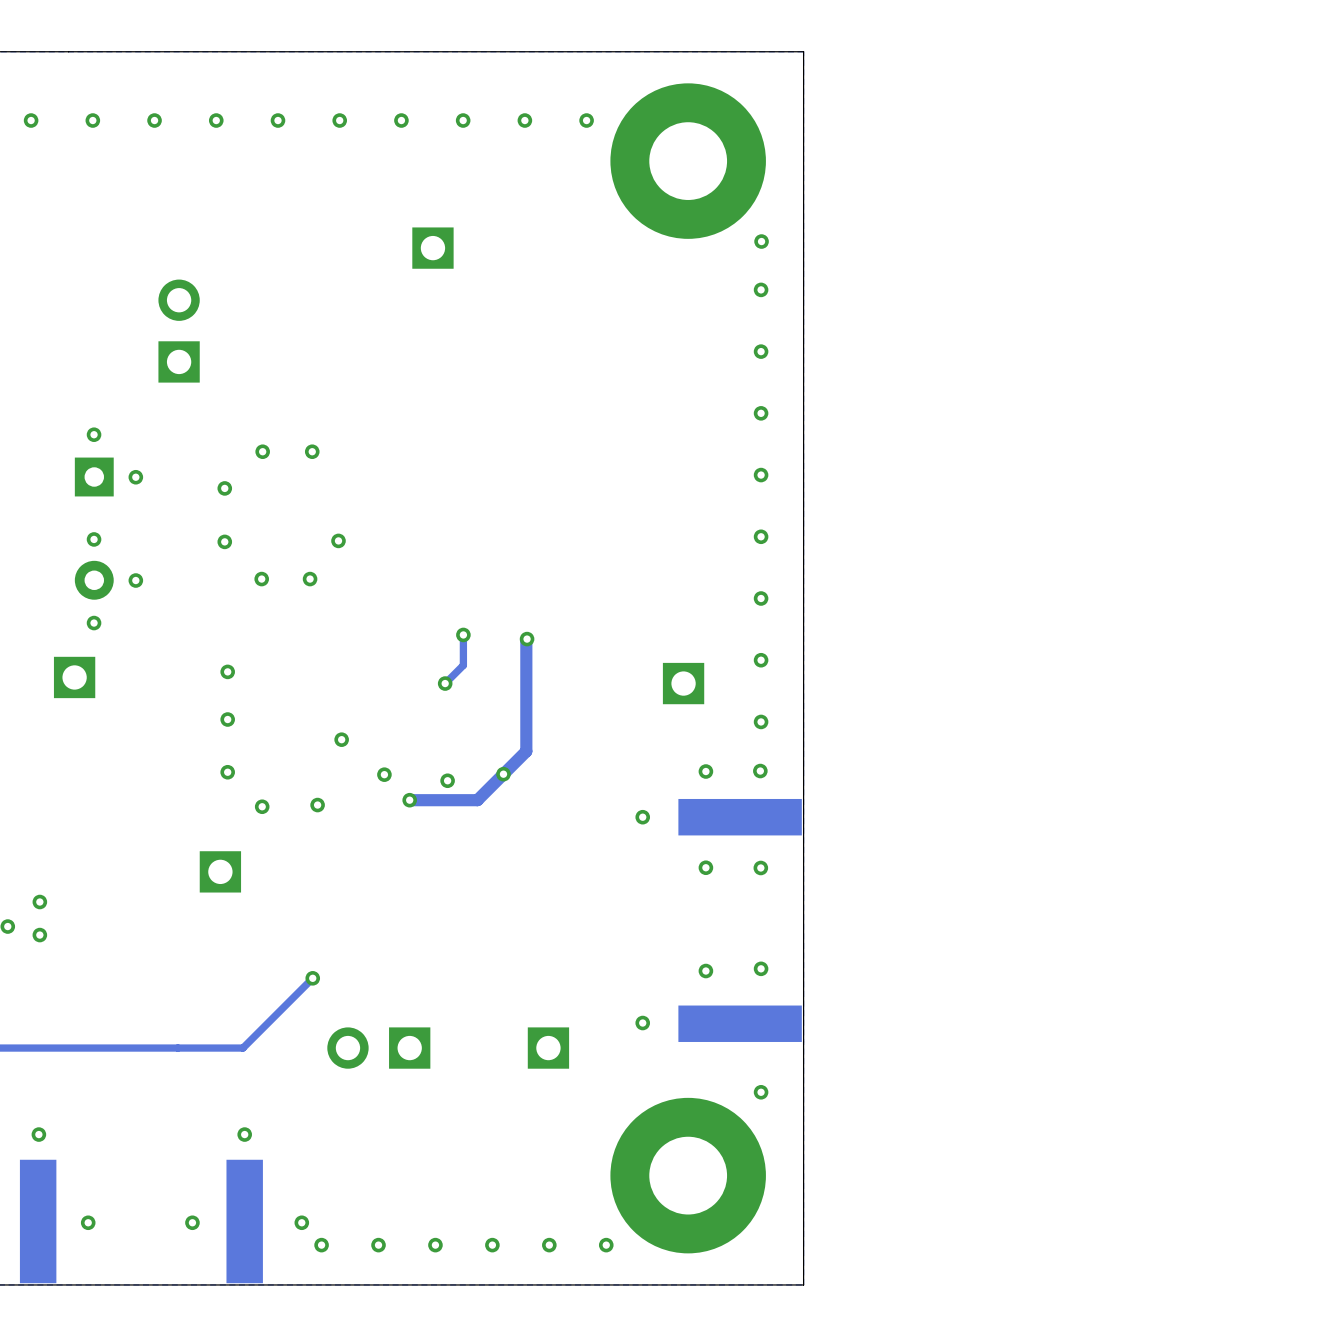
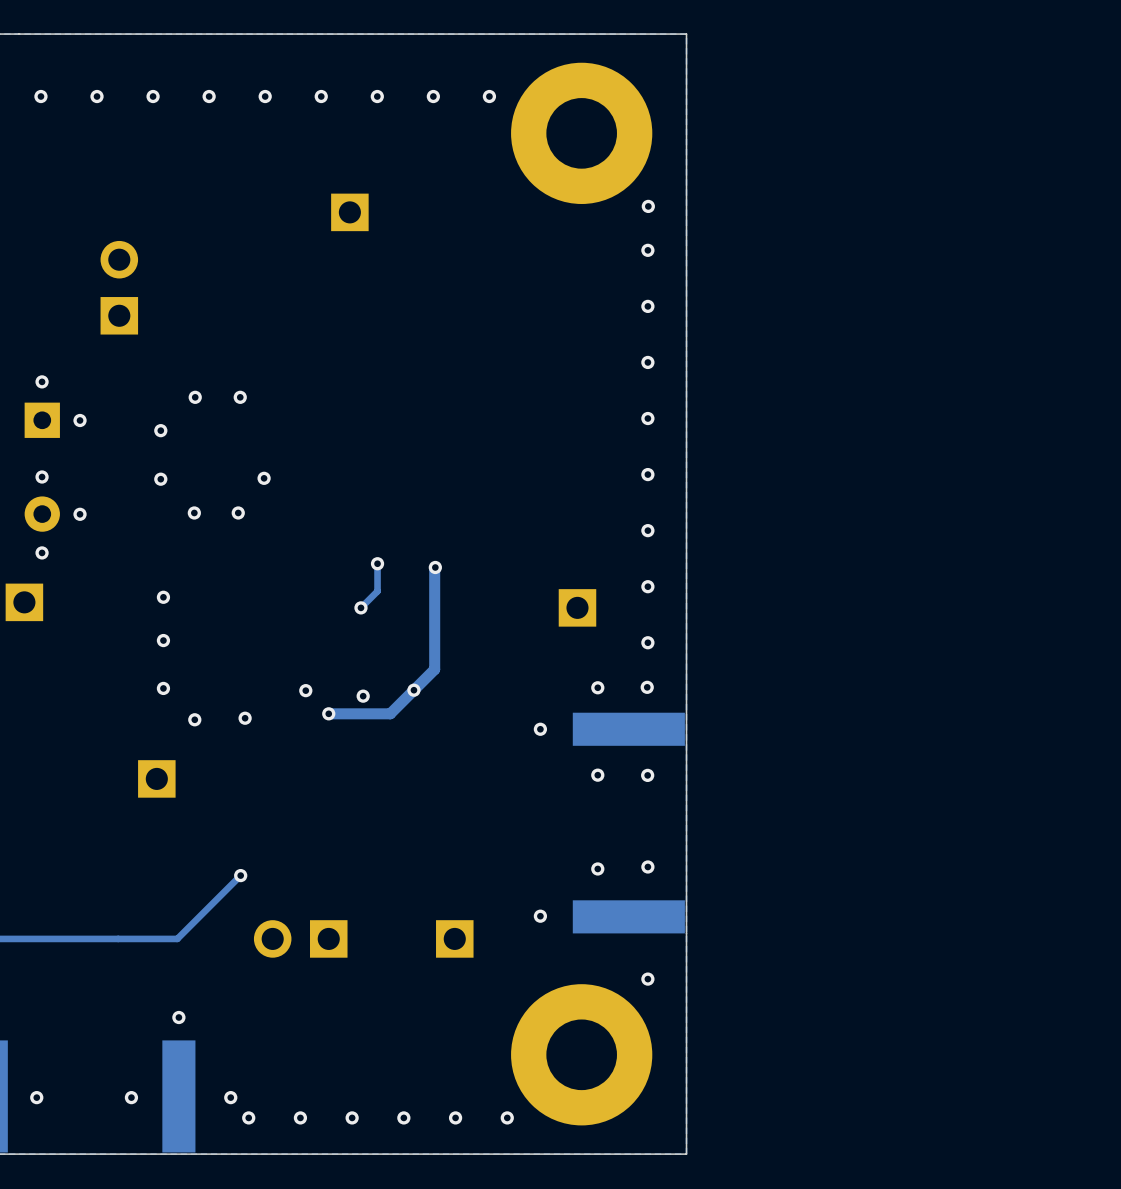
via: (341, 739) -> none

